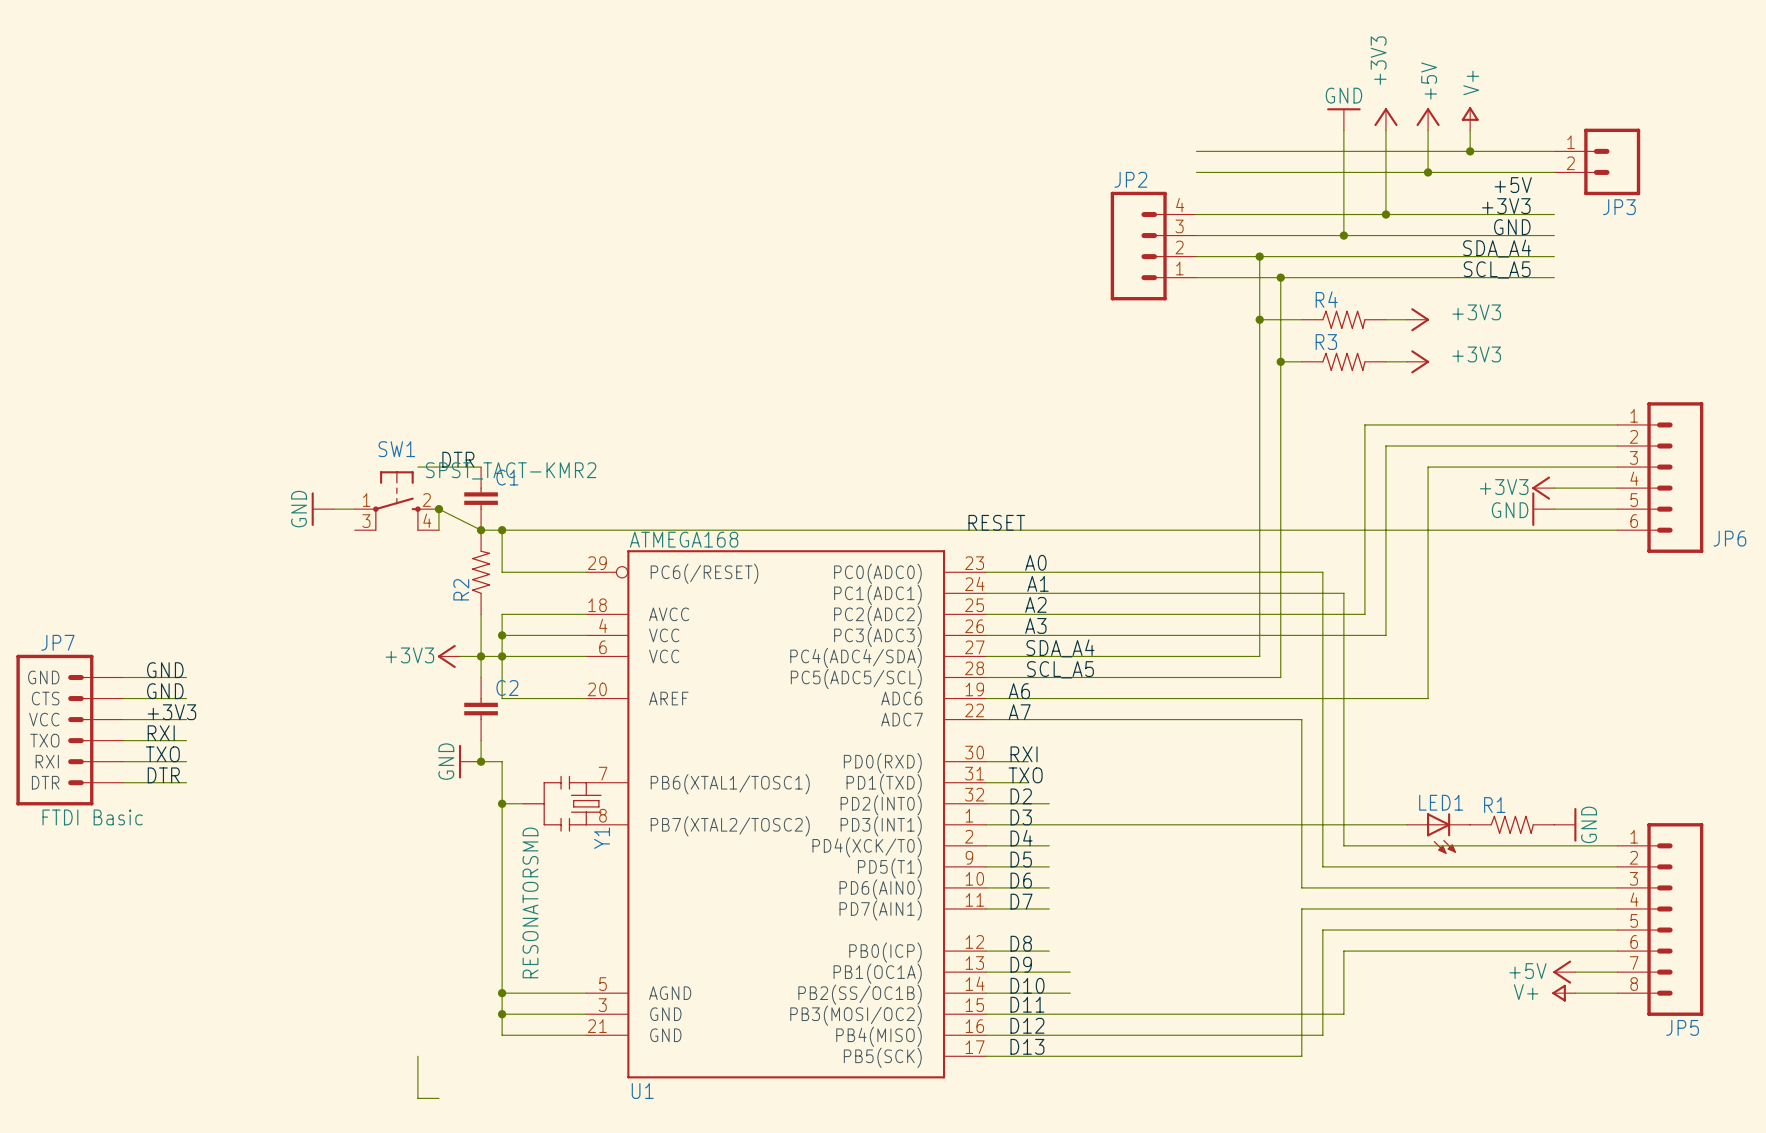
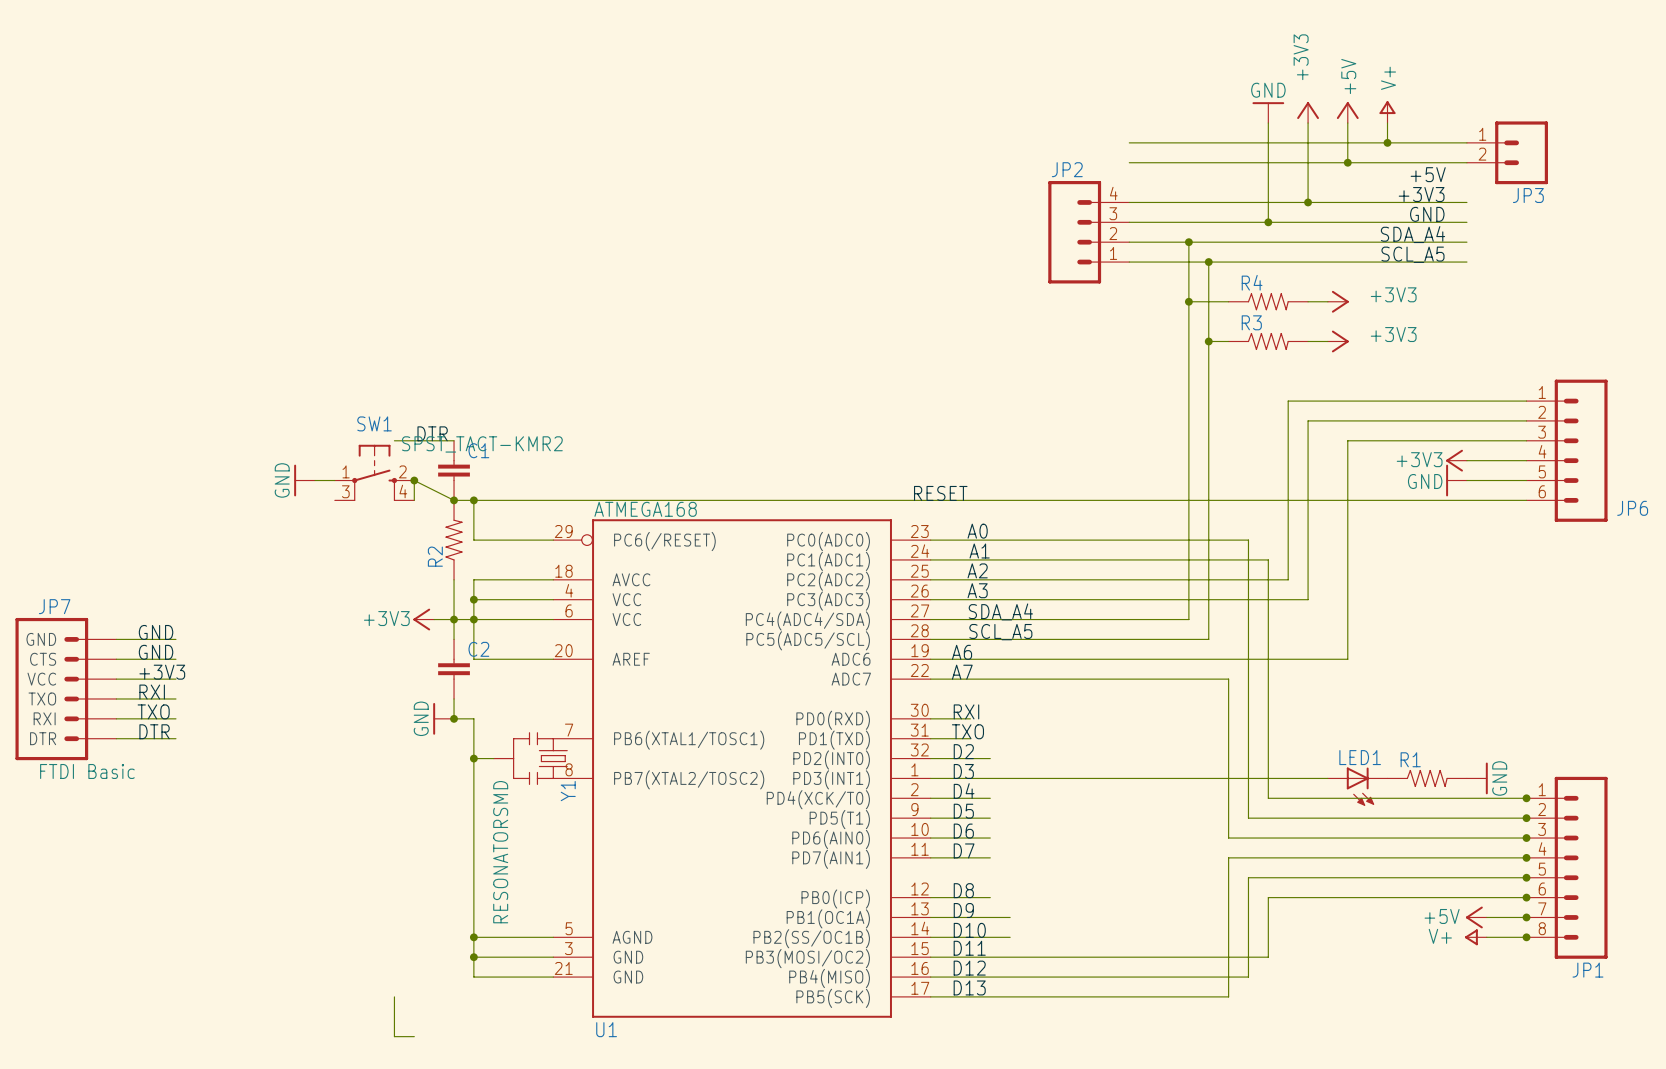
junction: none -> (1526, 798)
junction: none -> (1526, 818)
junction: none -> (1526, 838)
junction: none -> (1526, 857)
junction: none -> (1526, 877)
junction: none -> (1526, 897)
junction: none -> (1526, 917)
junction: none -> (1526, 937)
JP5 name: JP5 (1682, 1027) -> JP1 (1587, 970)

